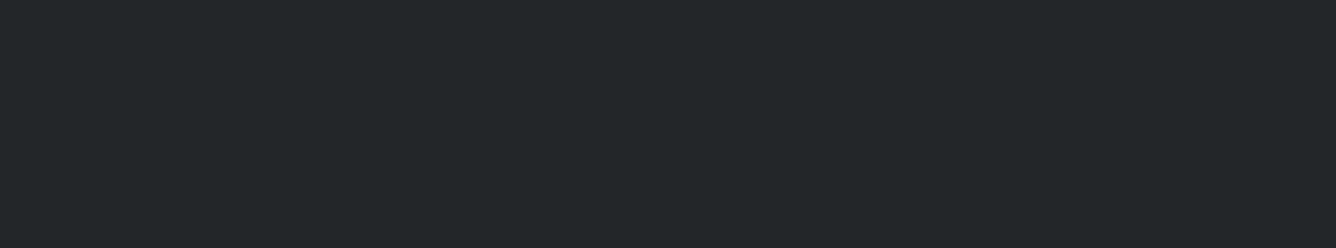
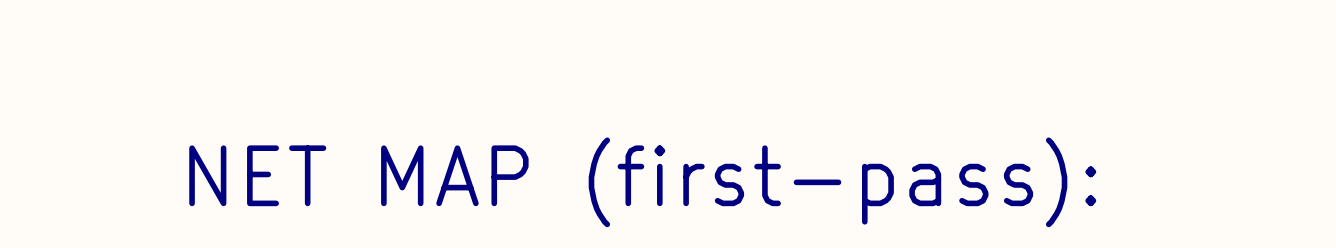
text: none -> NET MAP (first-pass): (642, 182)

